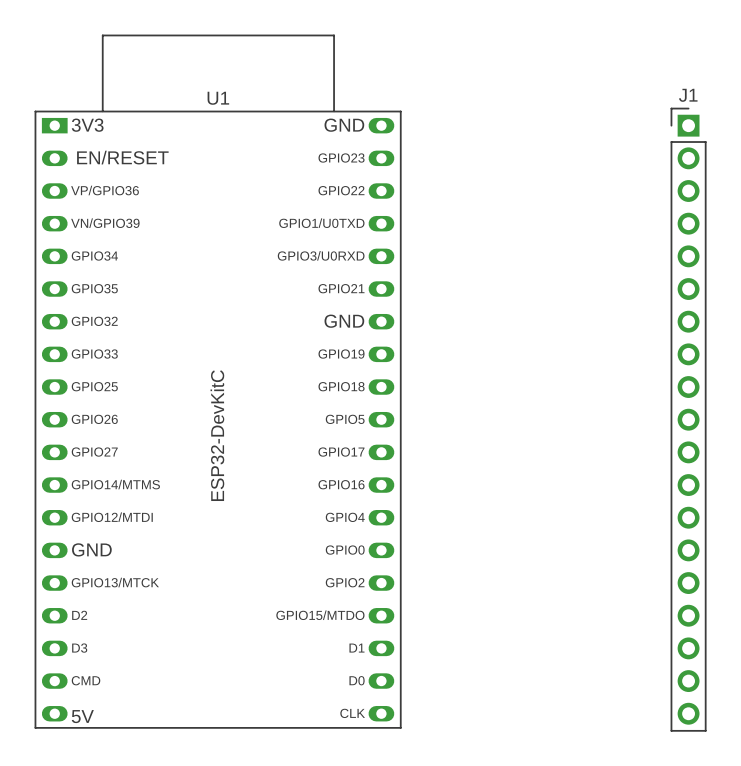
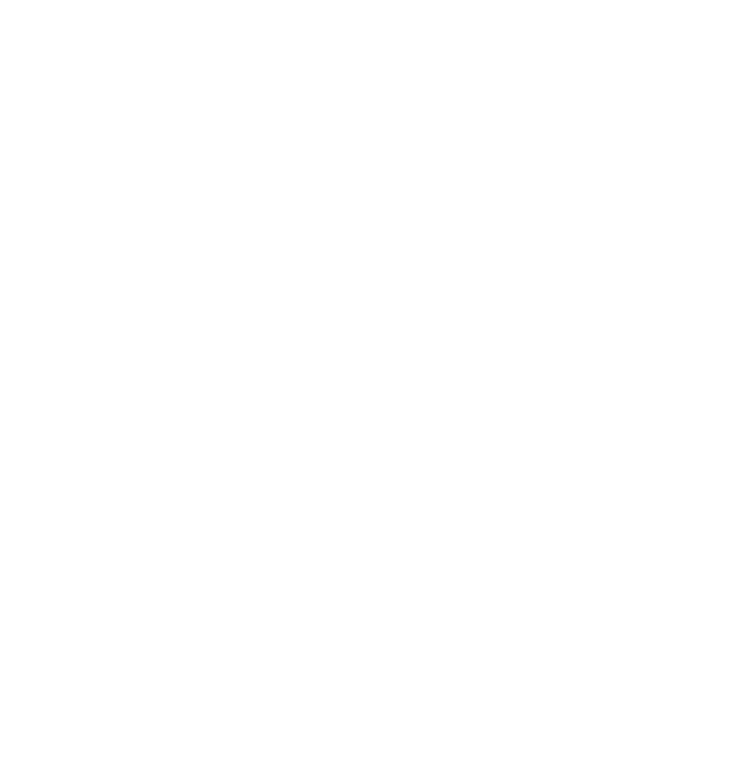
U1: ESP32-DevKitC (218, 381) -> none
J1: (688, 419) -> none

